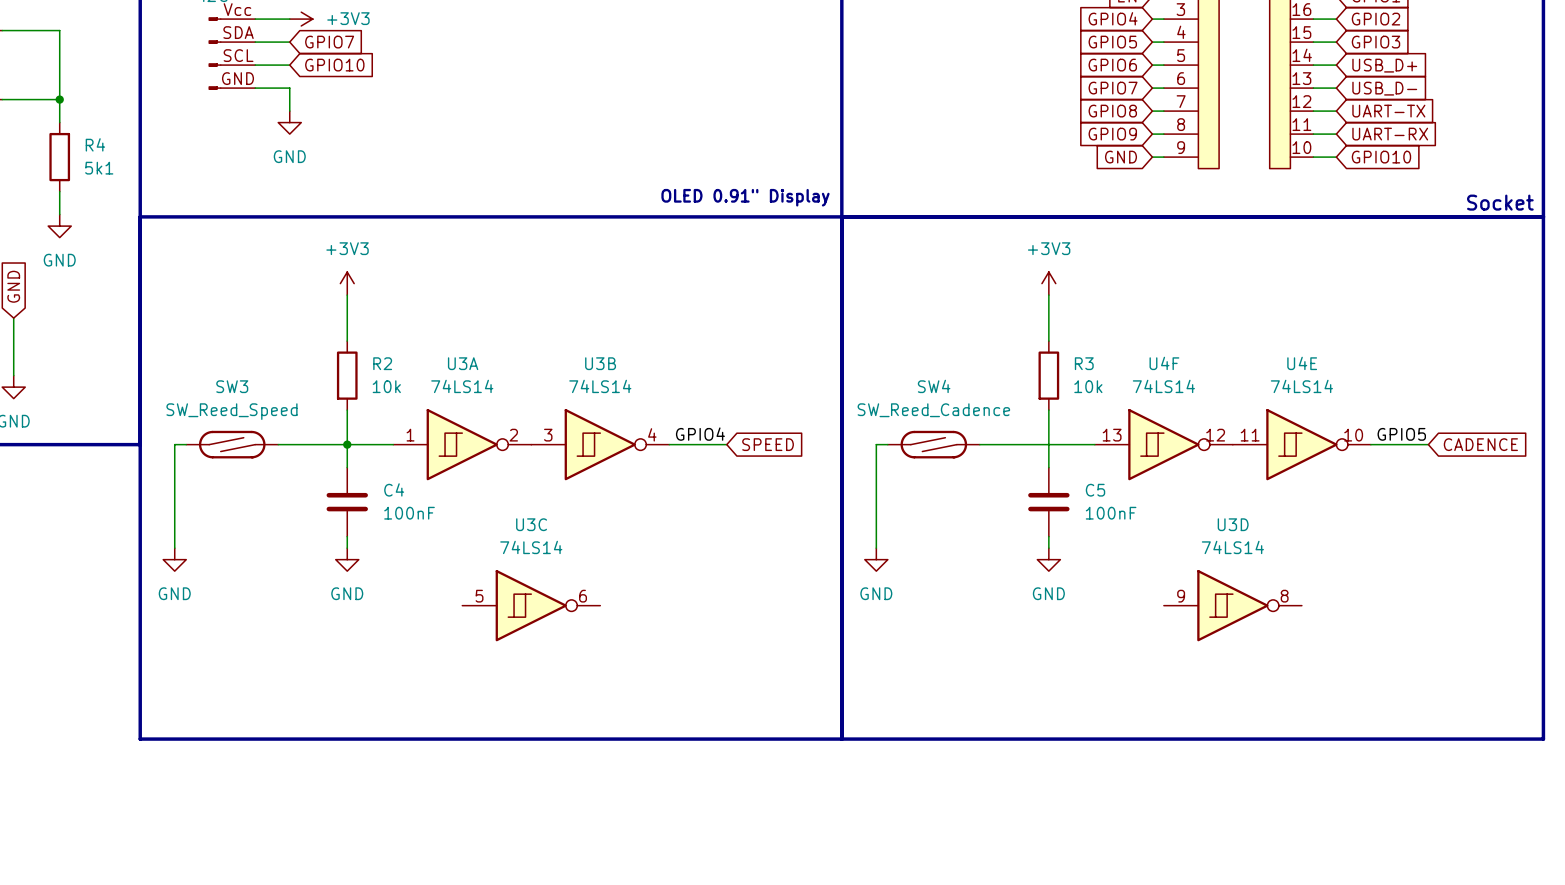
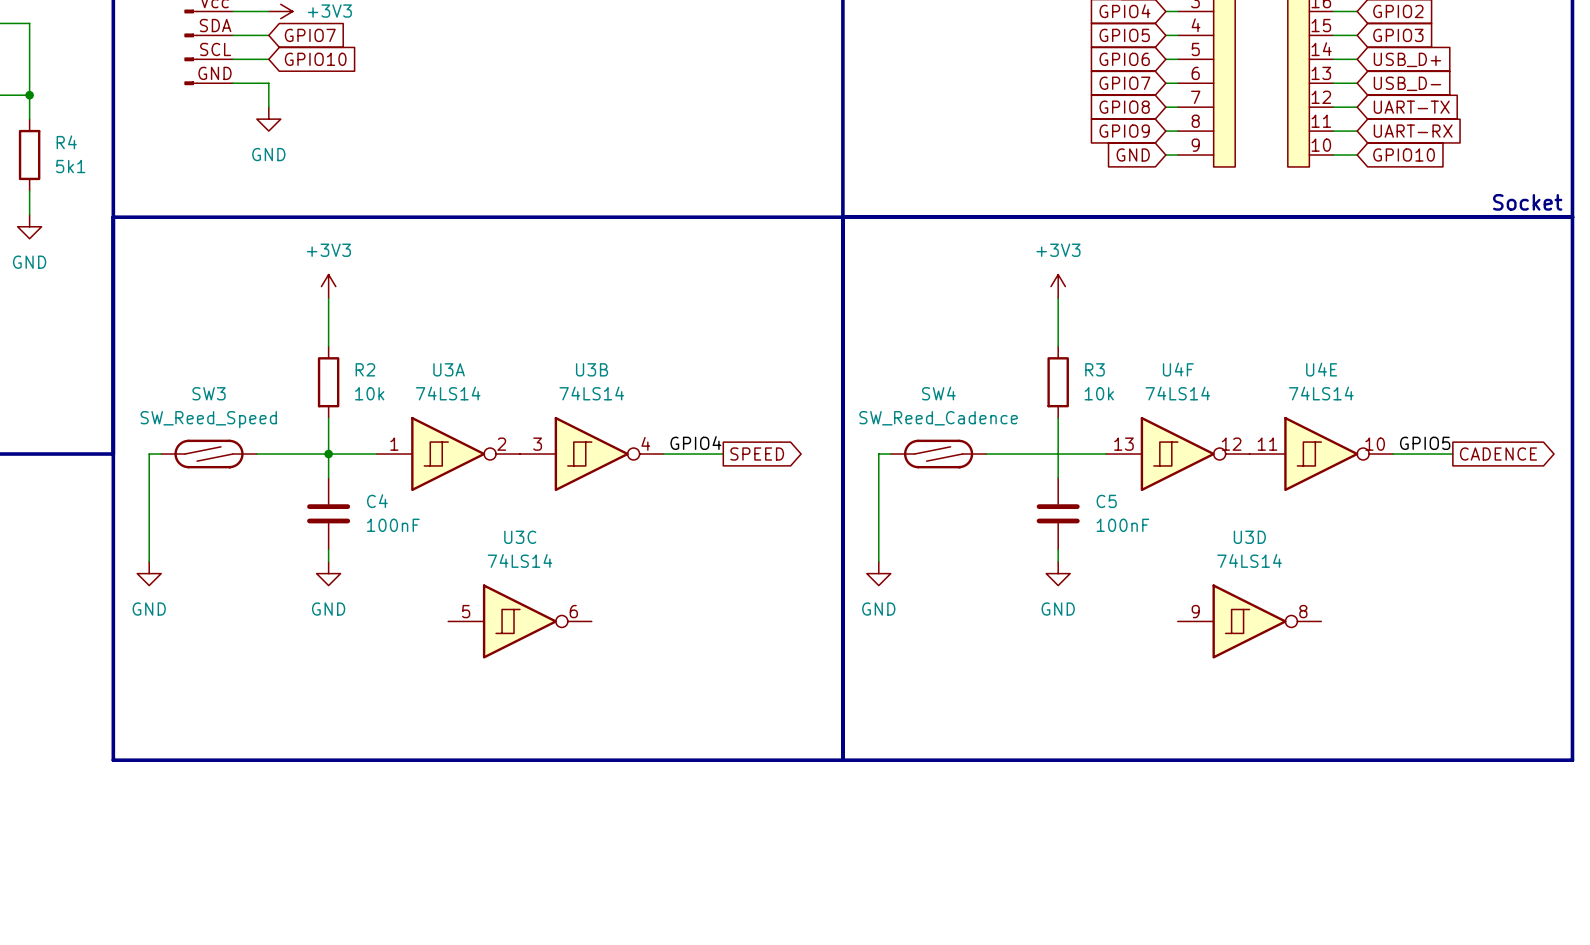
text: OLED 0.91" Display (745, 197) -> none
global label shape: input (768, 444) -> output (757, 454)
global label shape: input (1480, 444) -> output (1498, 454)

